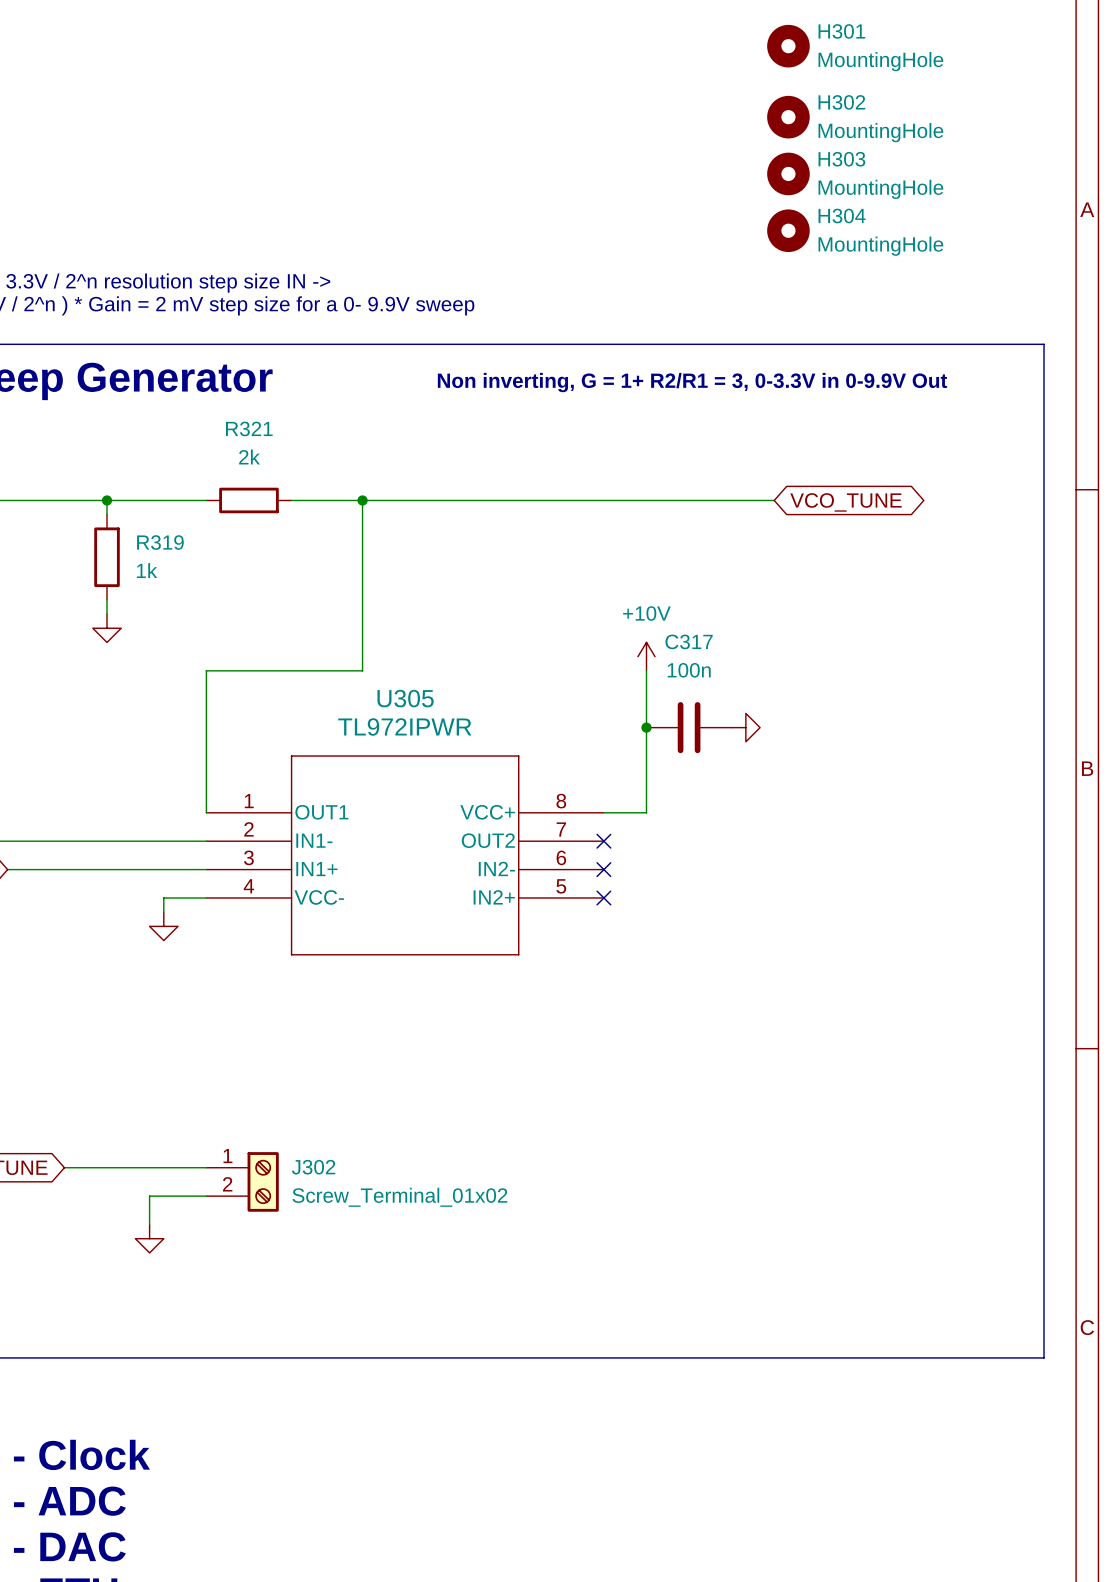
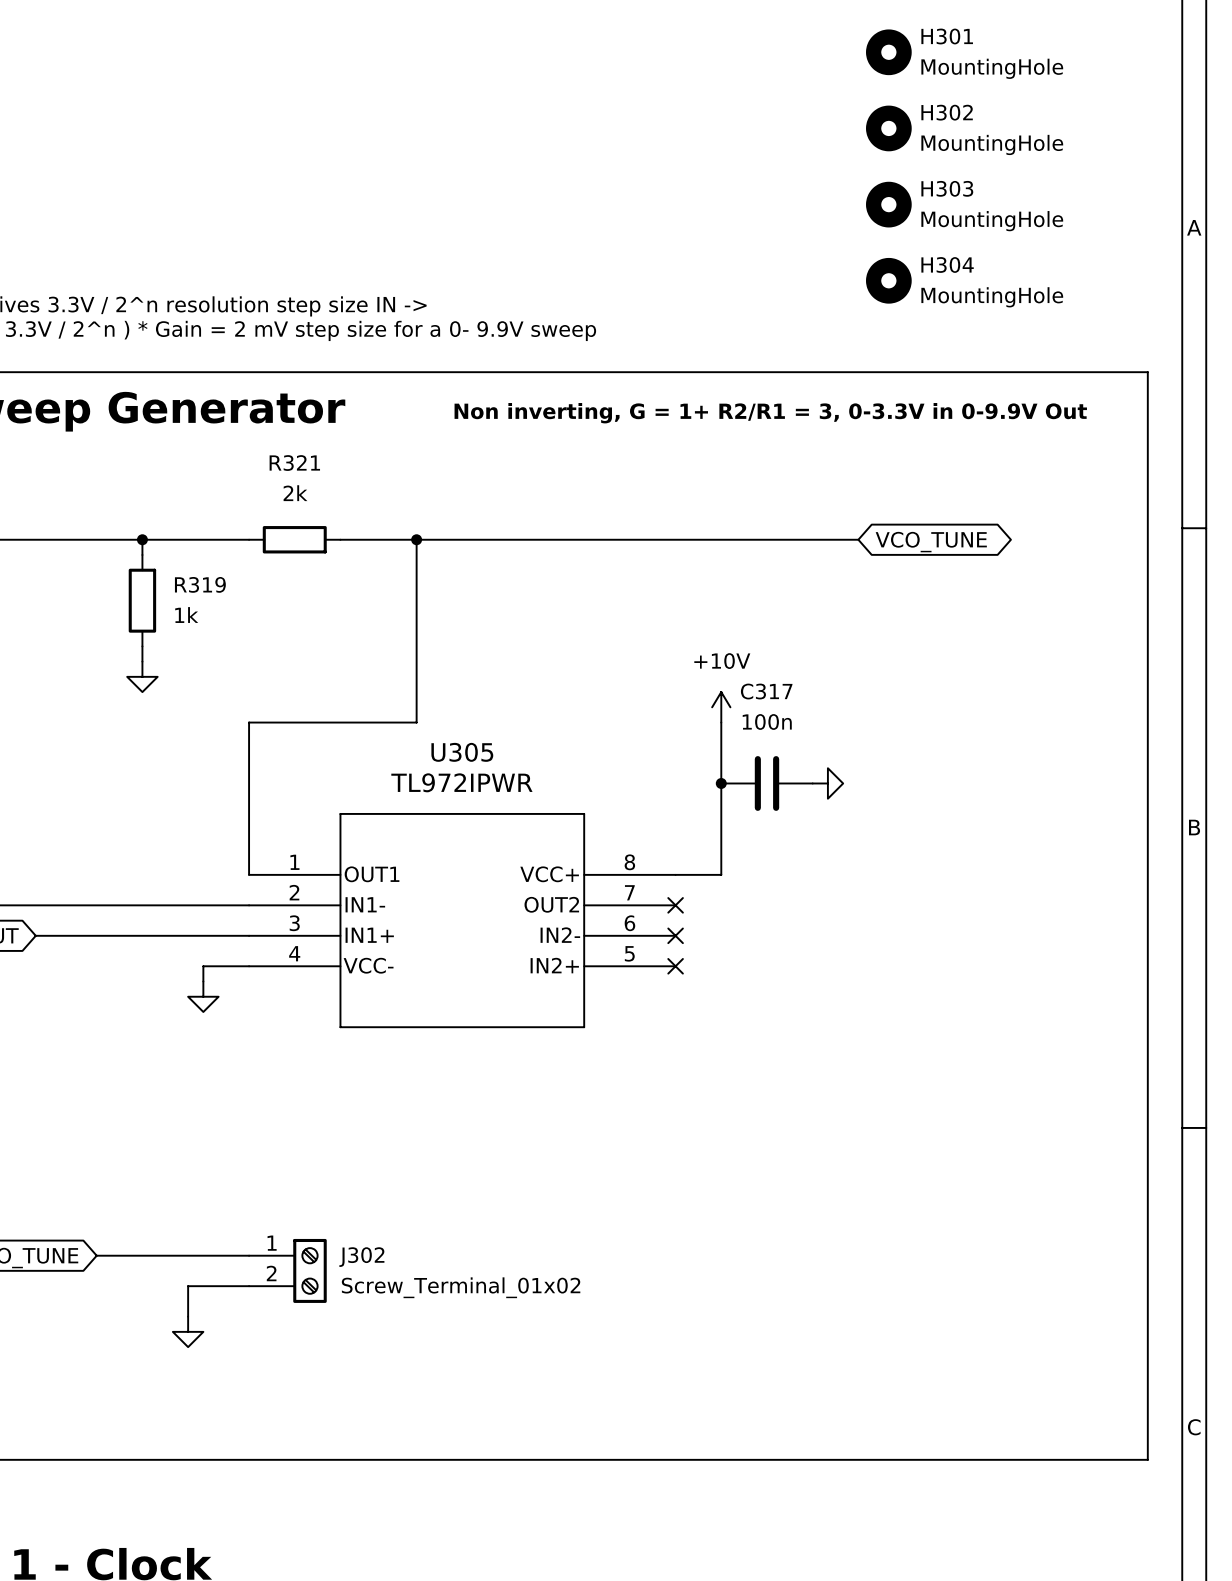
H301 position: (788, 46) -> (888, 52)
H302 position: (788, 117) -> (888, 128)
H303 position: (788, 173) -> (888, 204)
H304 position: (788, 230) -> (888, 280)

